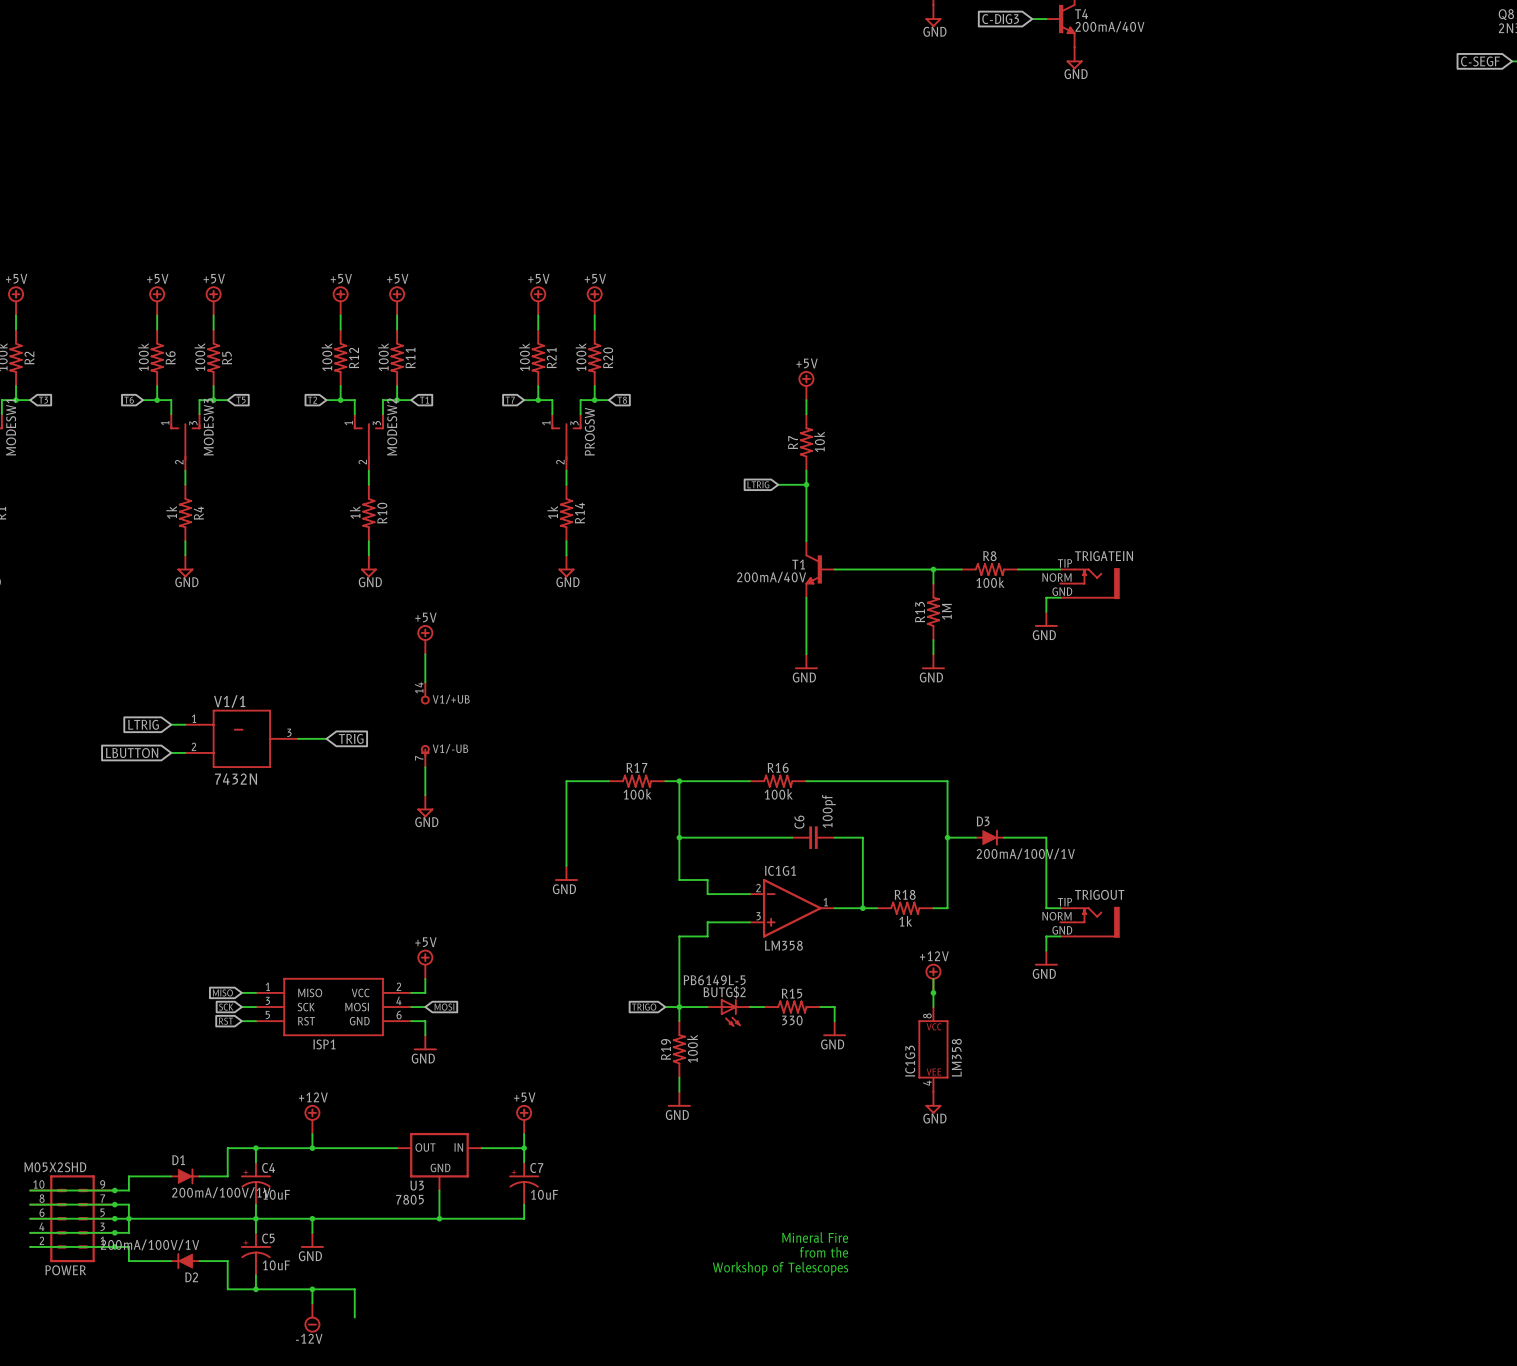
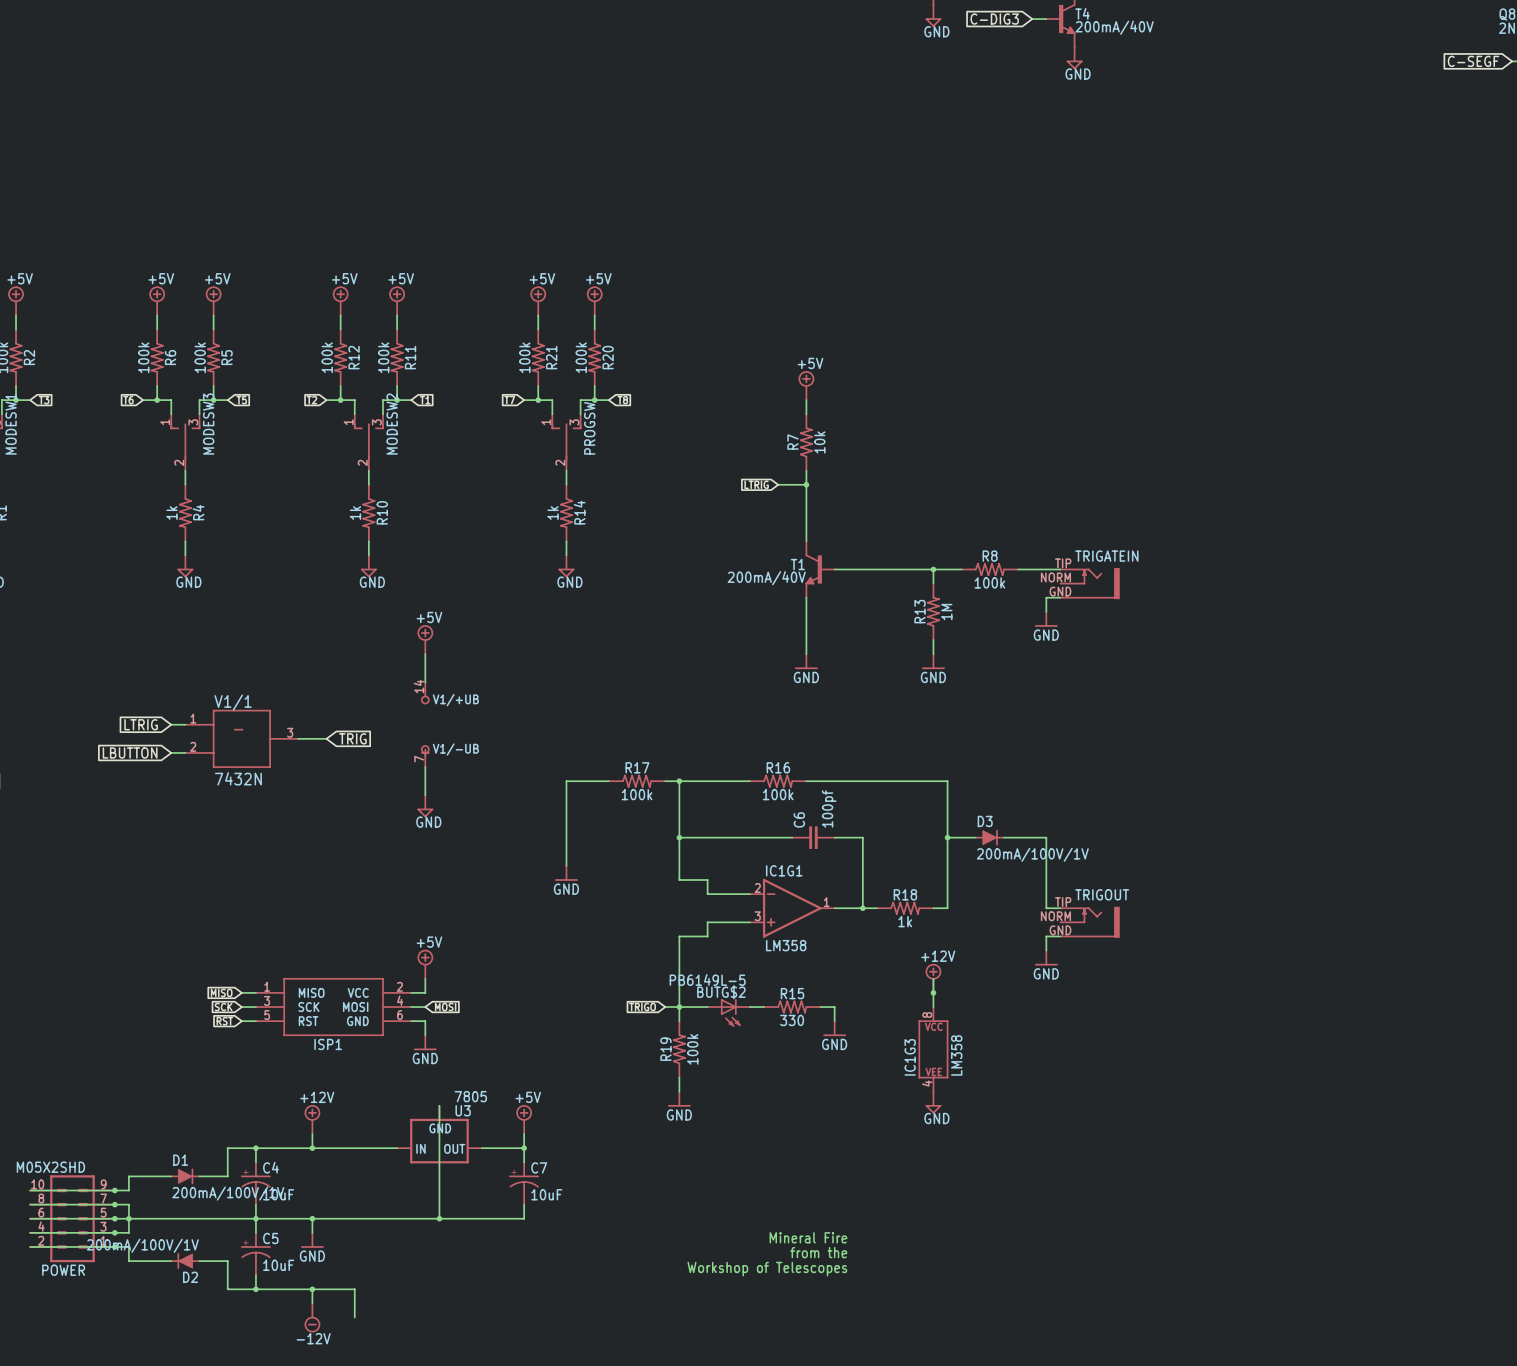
wire: none -> (439, 1105) (439, 1190)
U3 symbol: [397, 1132, 482, 1191] -> [397, 1105, 482, 1164]
U3 name position: U3 (417, 1185) -> U3 (463, 1110)
U3 value position: 7805 (409, 1199) -> 7805 (470, 1096)

